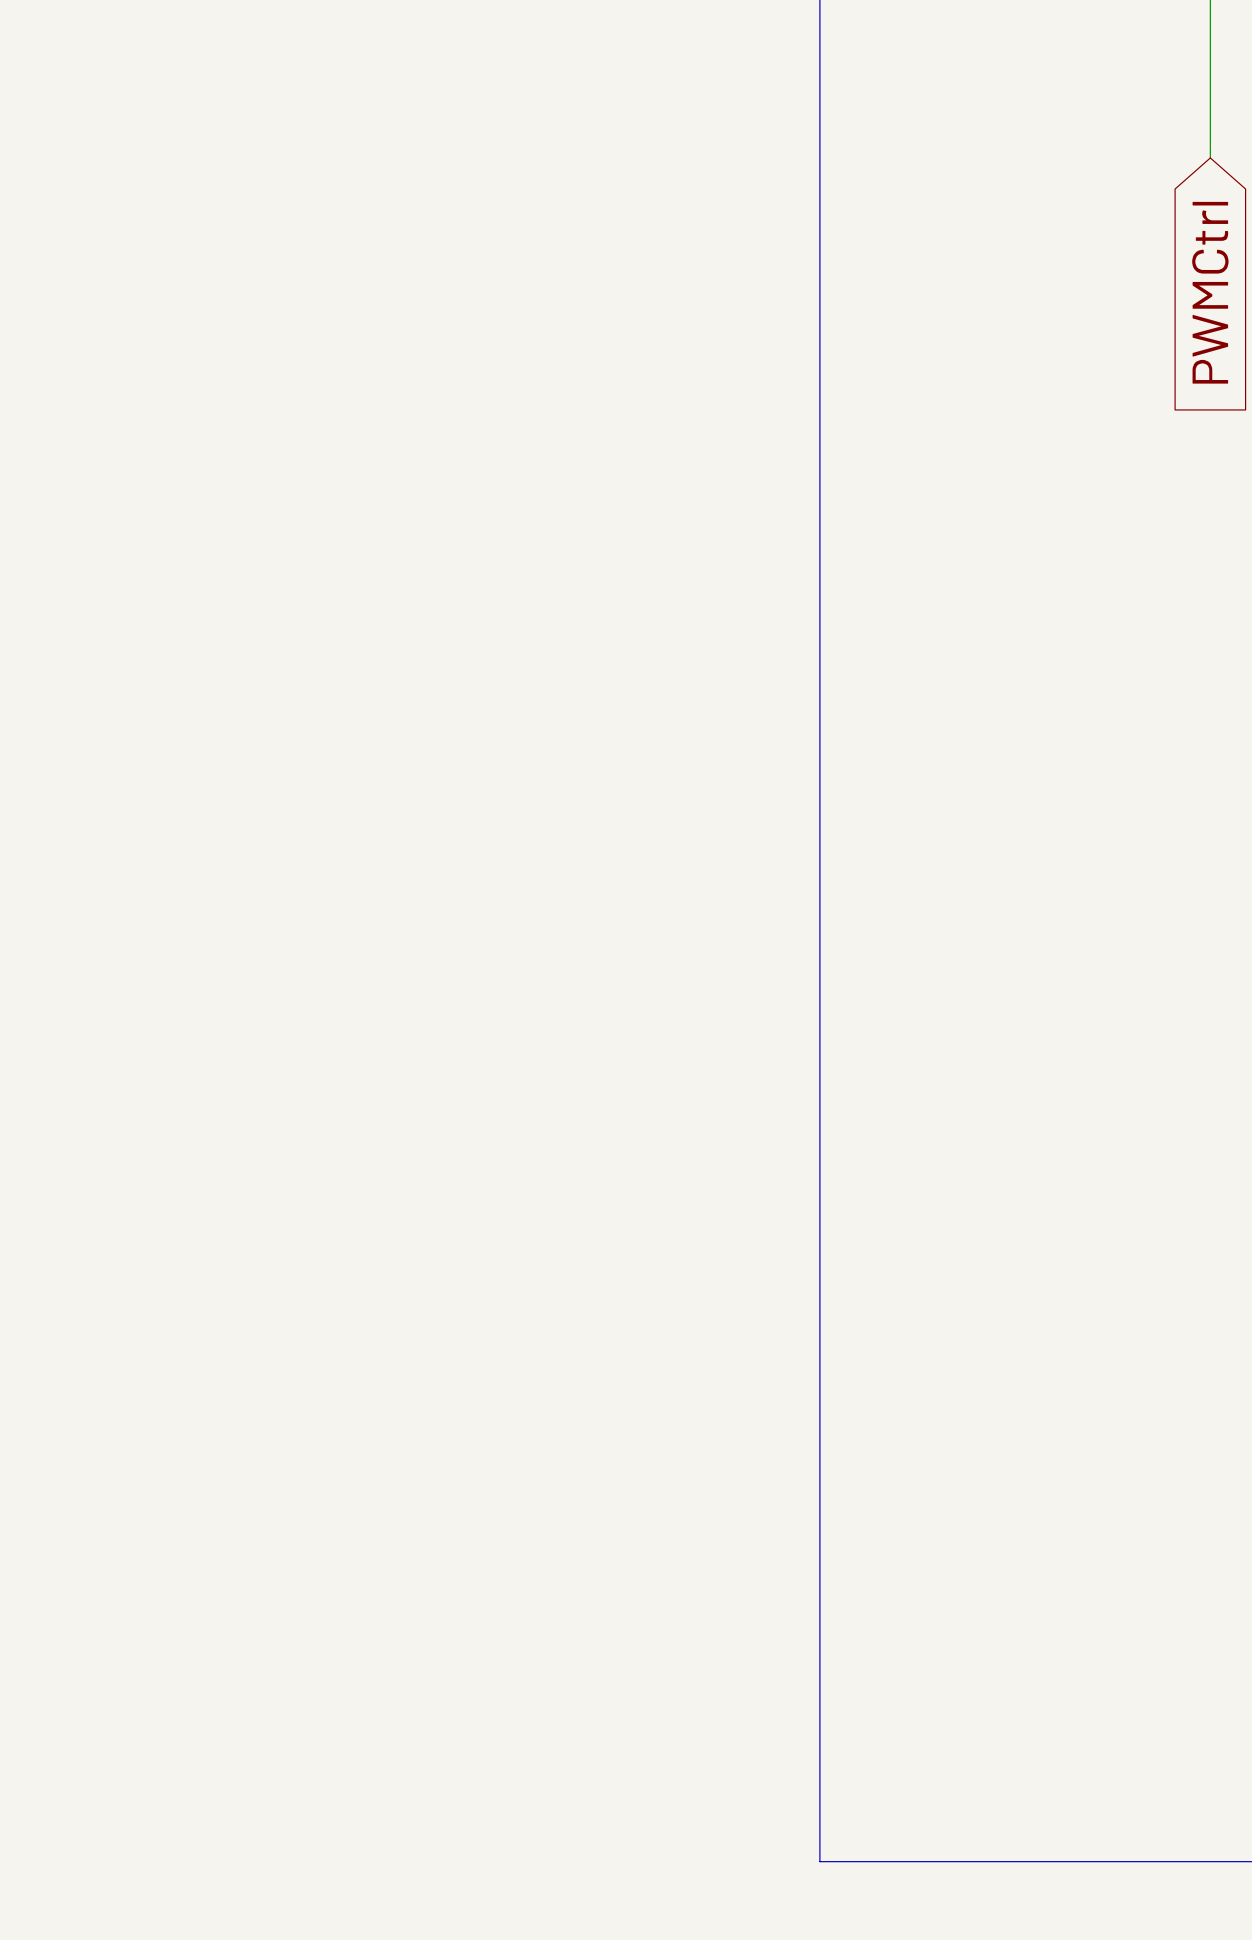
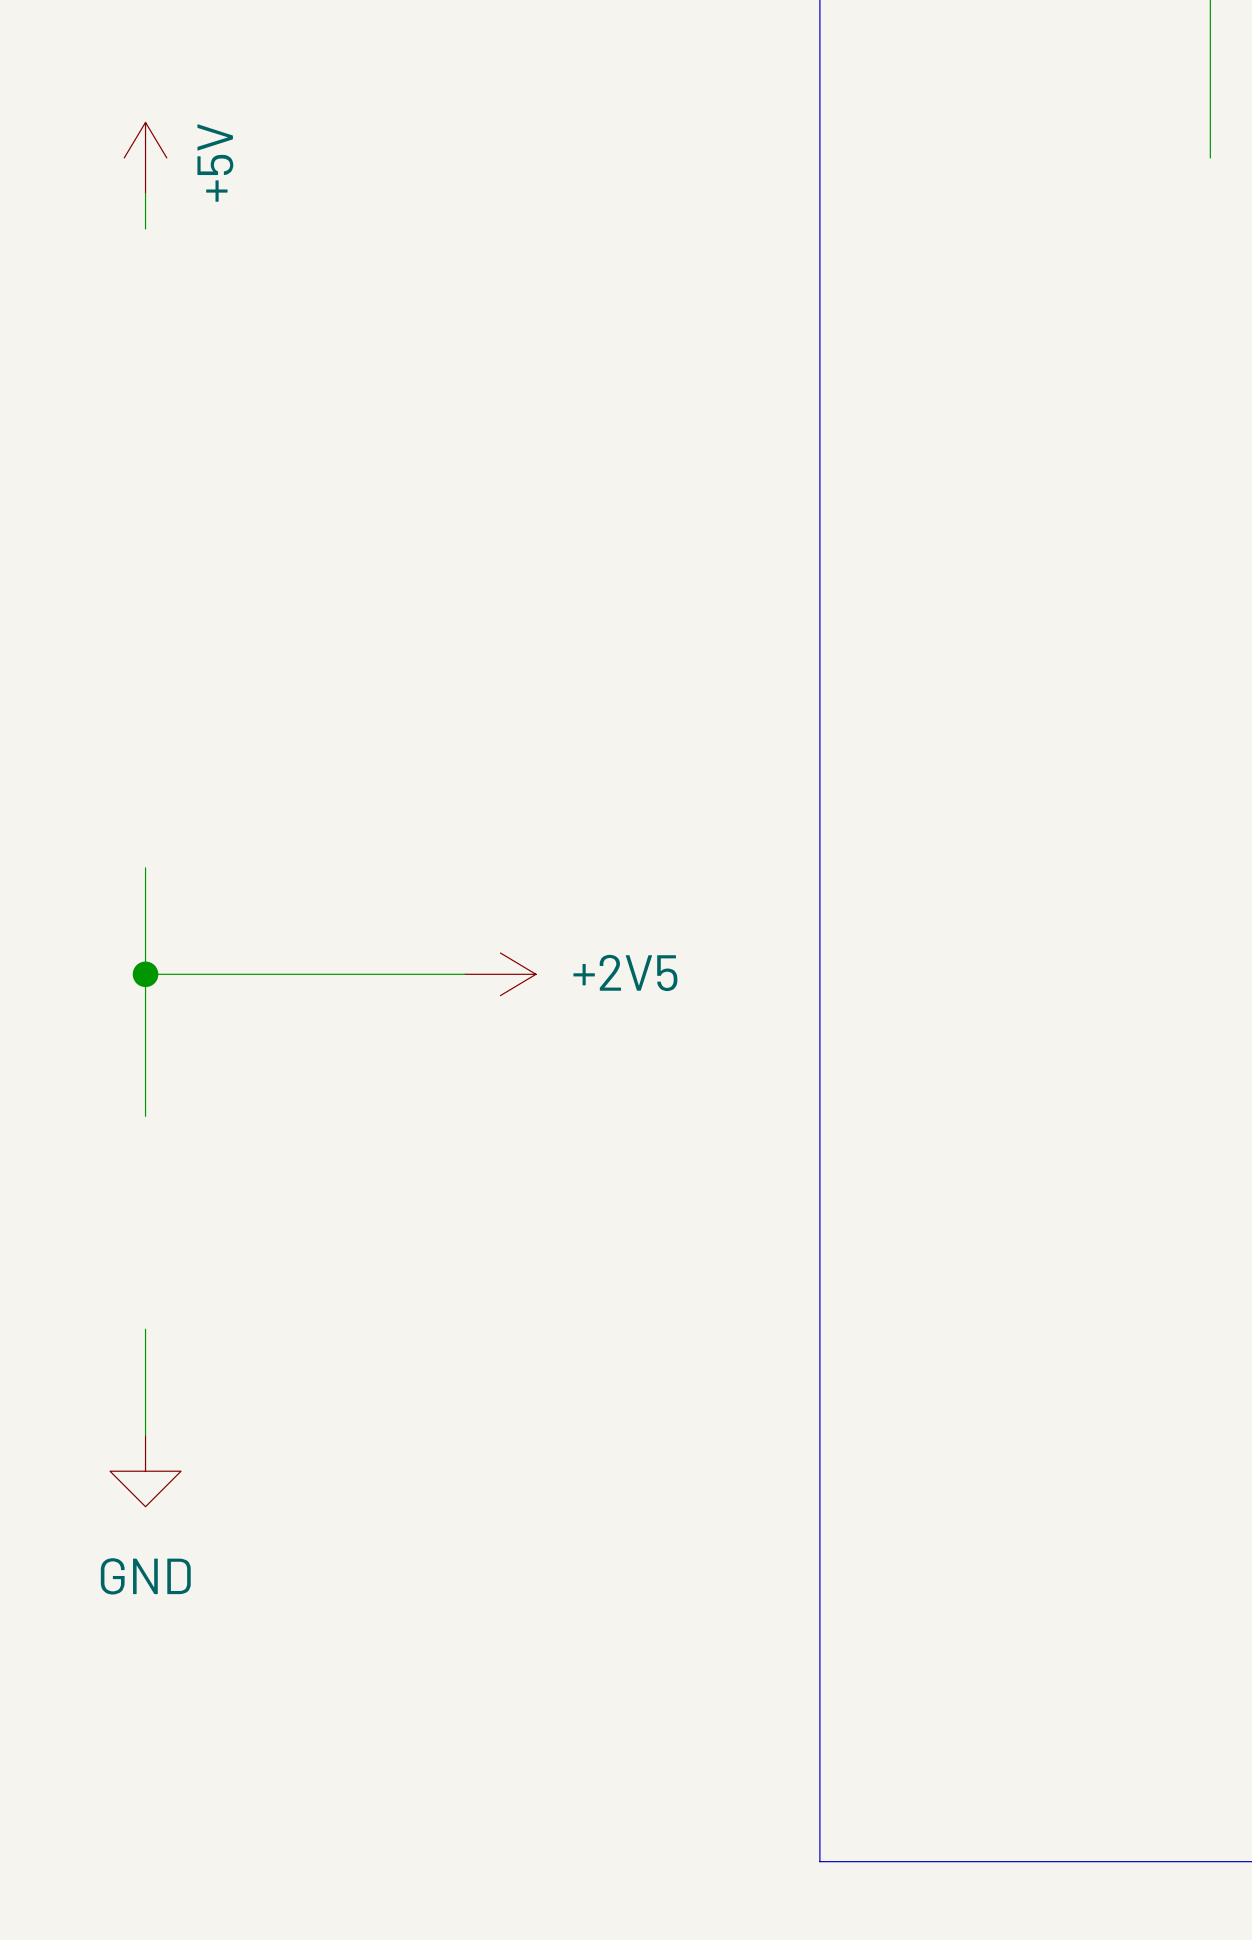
power symbol: none -> +5V (145, 157)
wire: none -> (145, 193) (145, 228)
global label: PWMCtrl (1210, 292) -> none
wire: none -> (145, 867) (145, 1116)
wire: none -> (145, 974) (464, 974)
junction: none -> (145, 974)
power symbol: none -> +2V5 (500, 974)
wire: none -> (145, 1329) (145, 1435)
power symbol: none -> GND (145, 1471)

